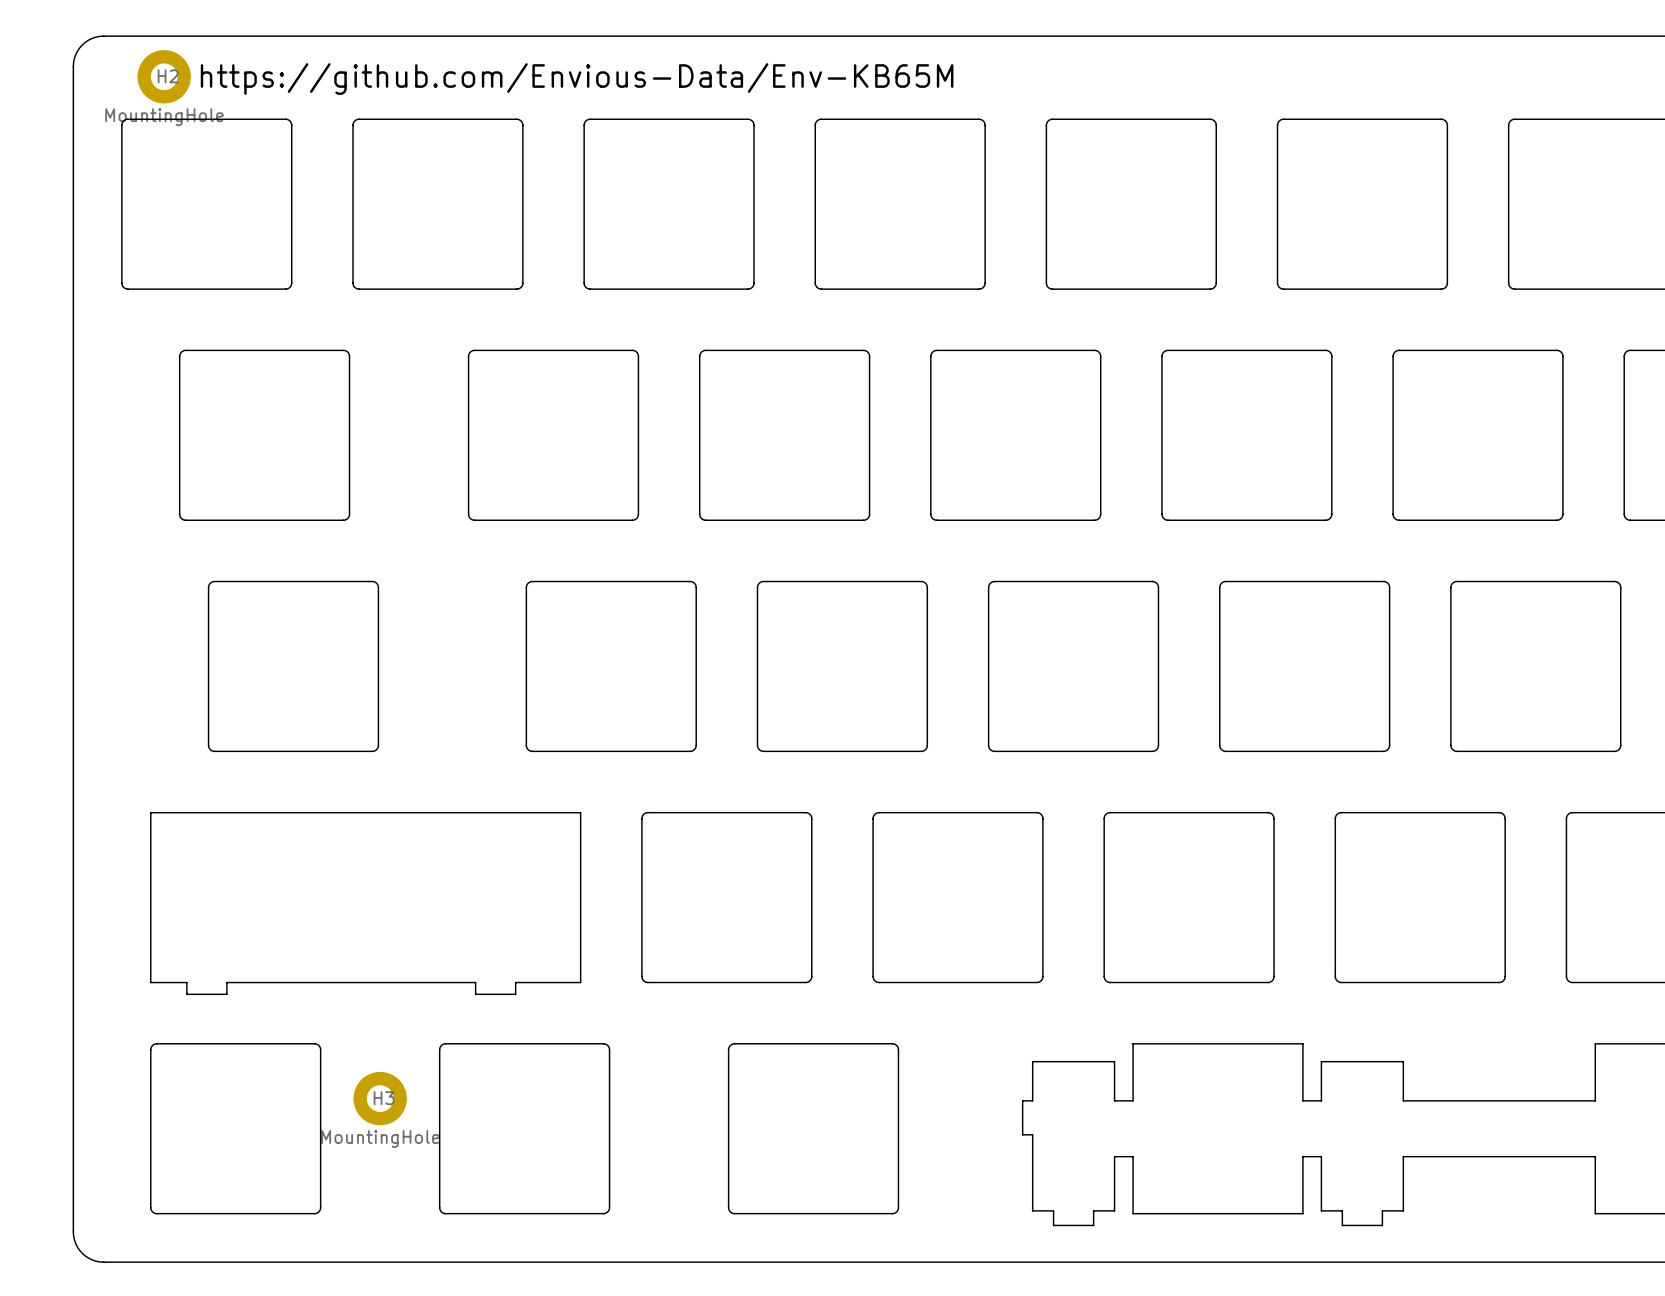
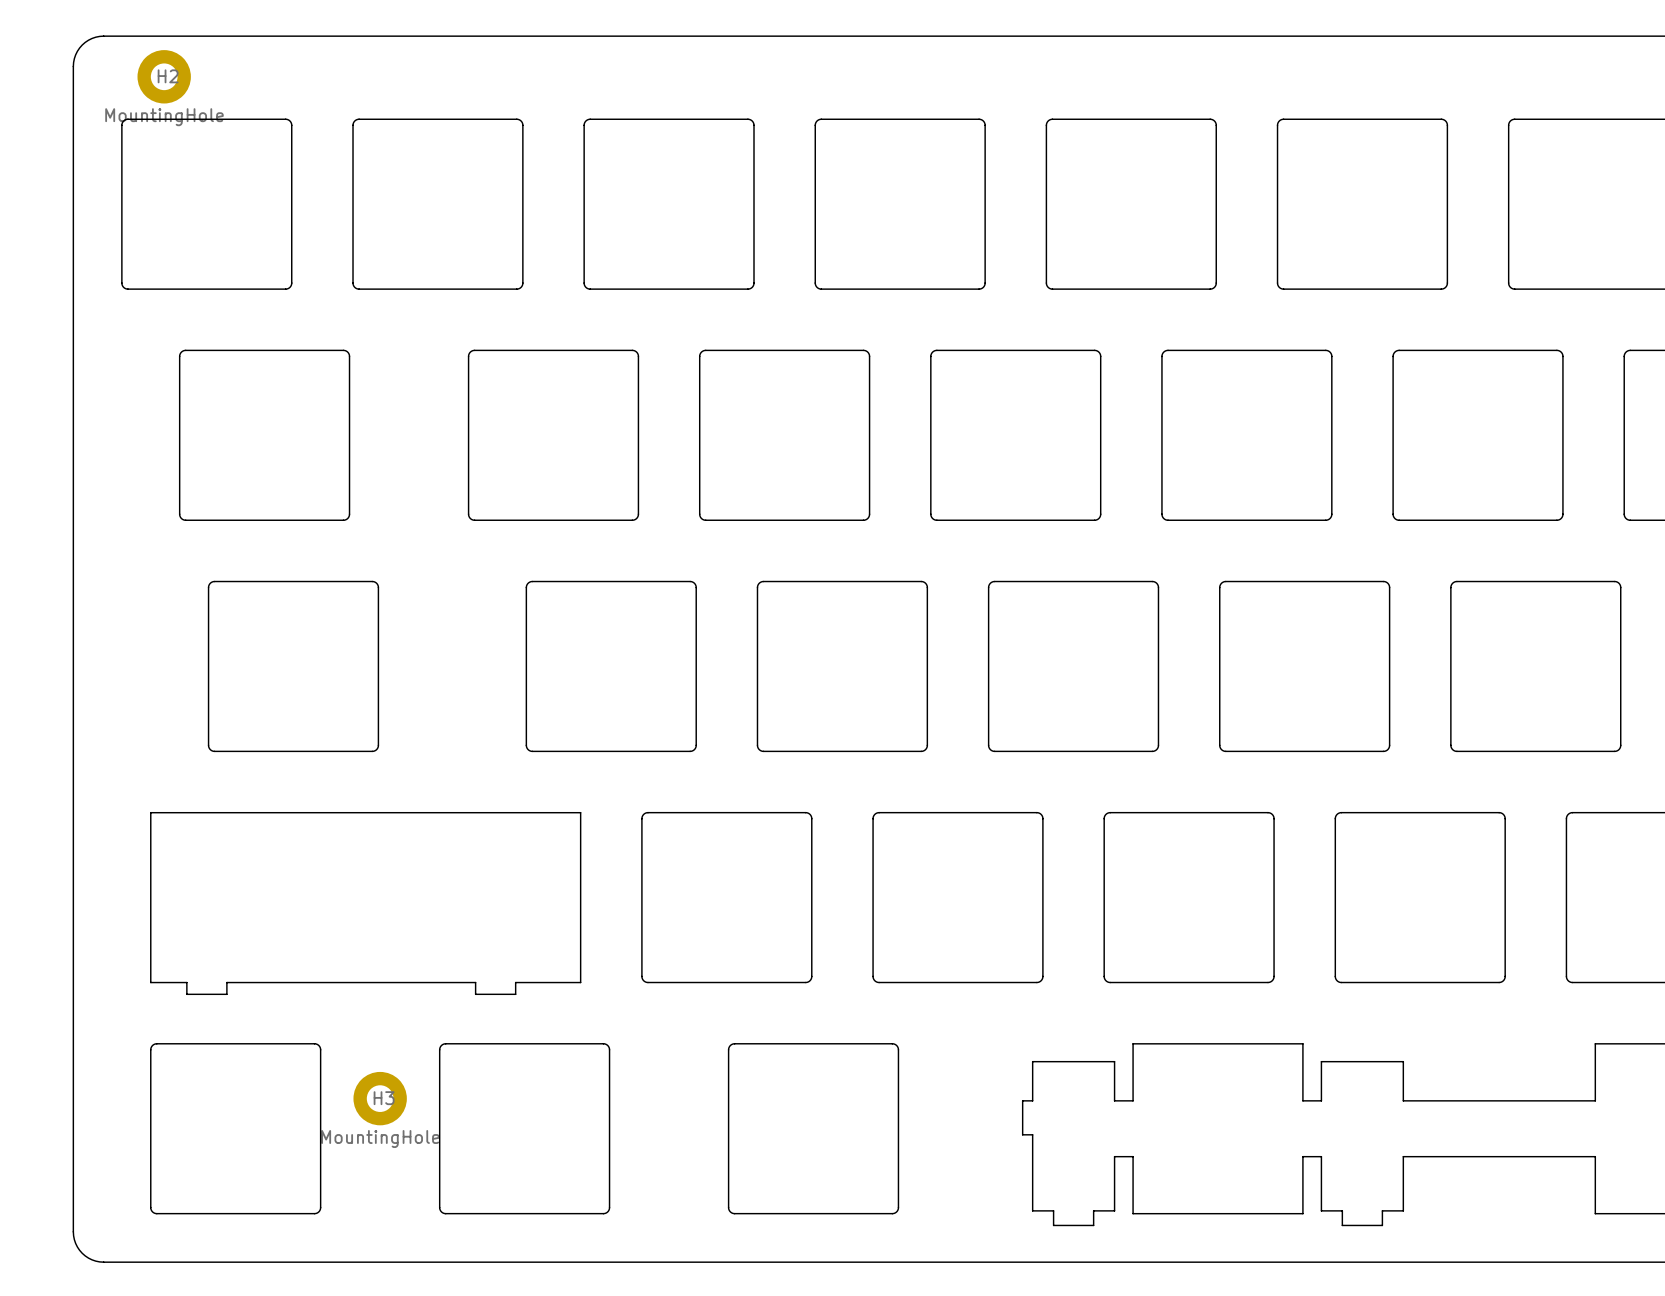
text: https://github.com/Envious-Data/Env-KB65M (577, 79) -> none

